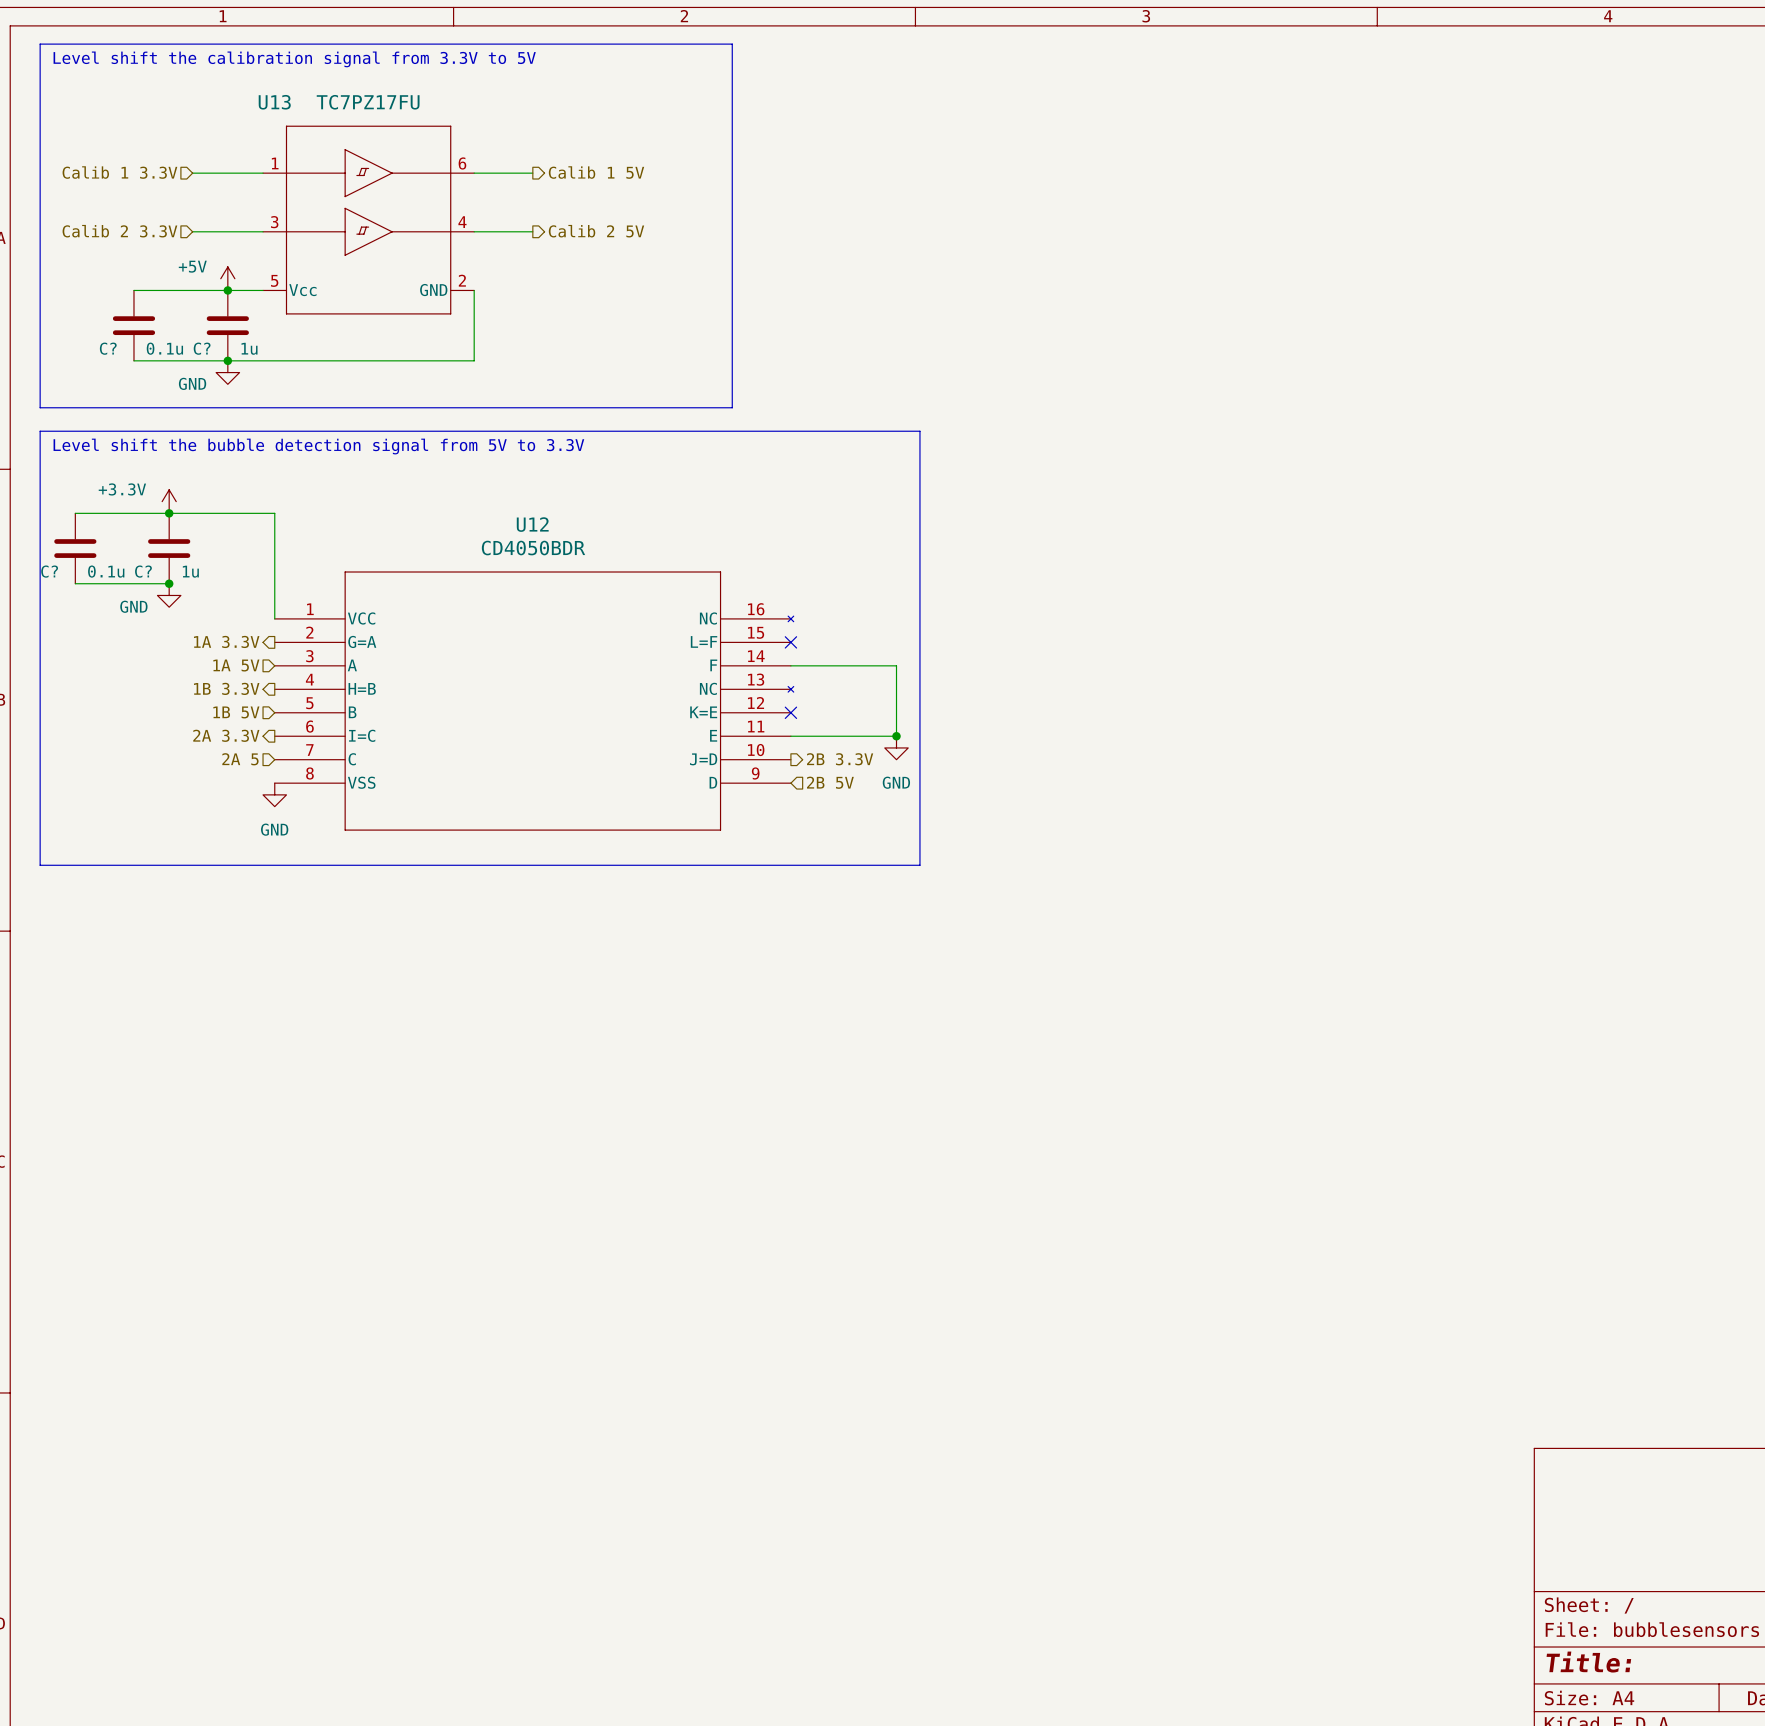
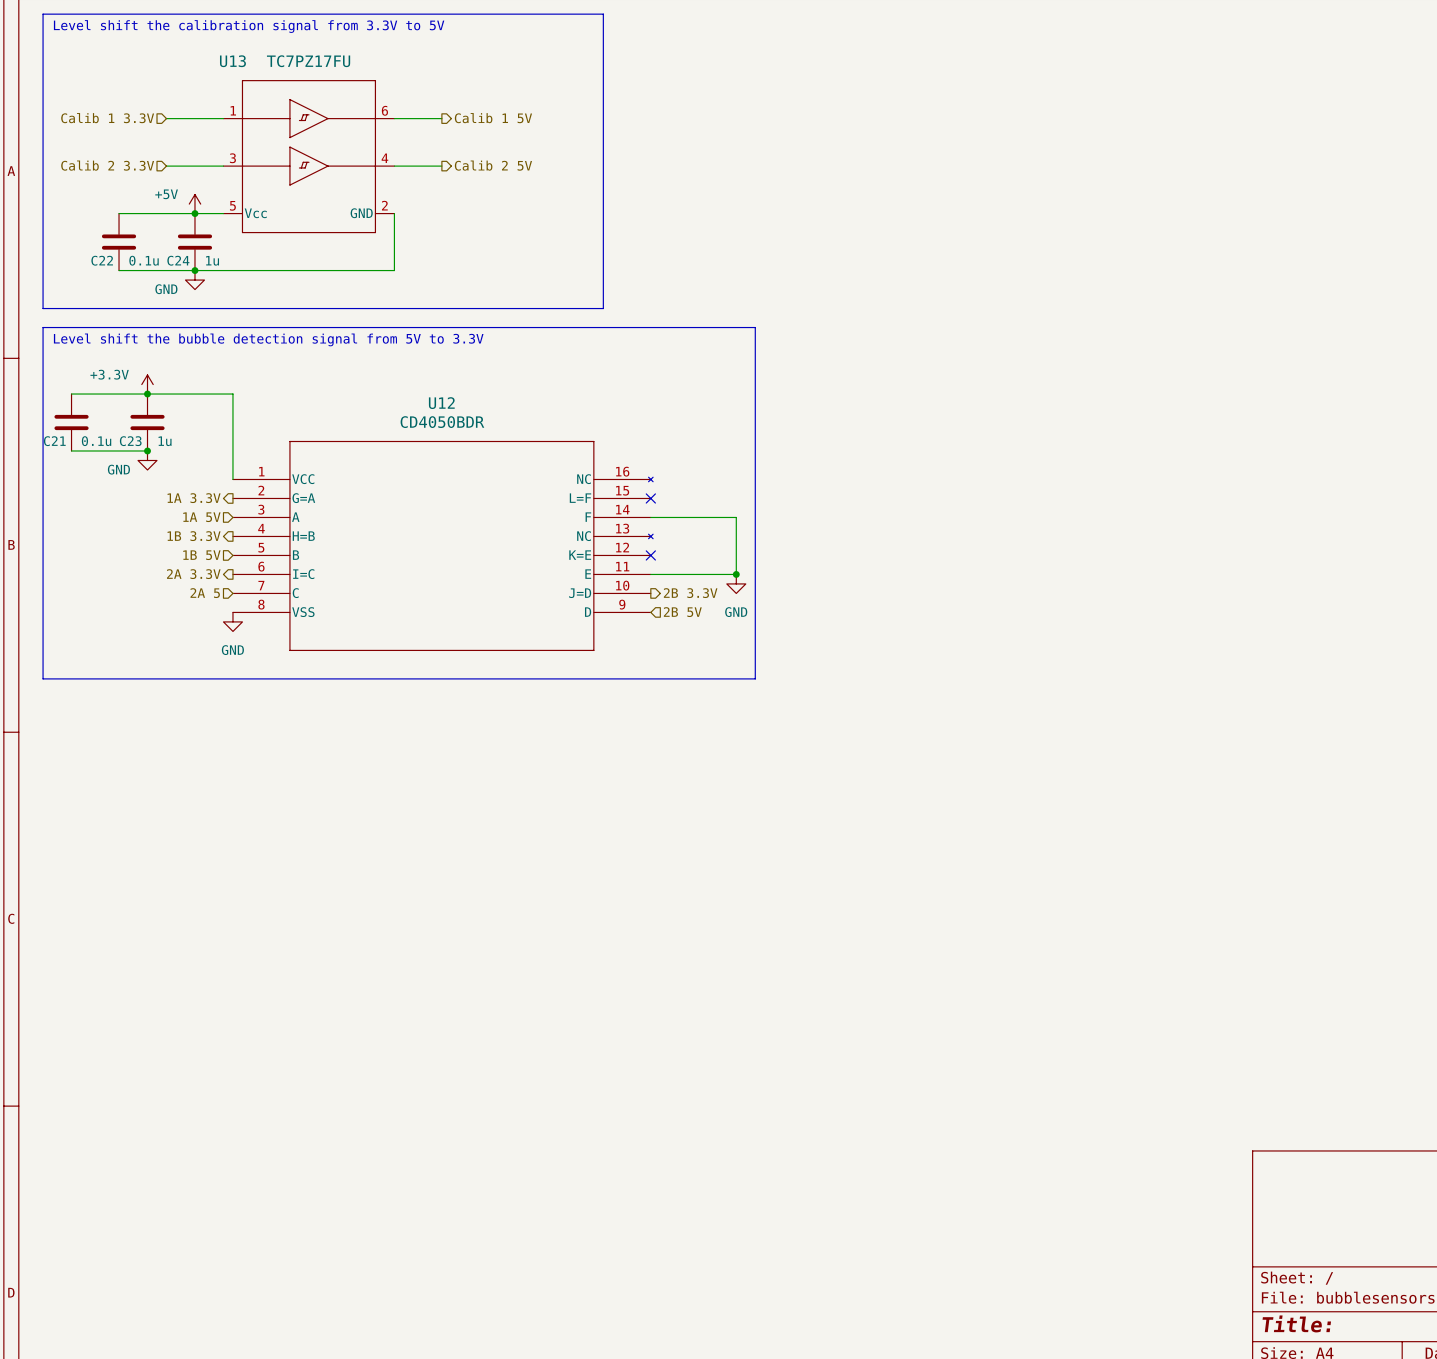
C? name: C? (108, 348) -> C22 (102, 260)
C? name: C? (202, 348) -> C24 (178, 260)
C? name: C? (49, 571) -> C21 (54, 441)
C? name: C? (143, 571) -> C23 (130, 441)

